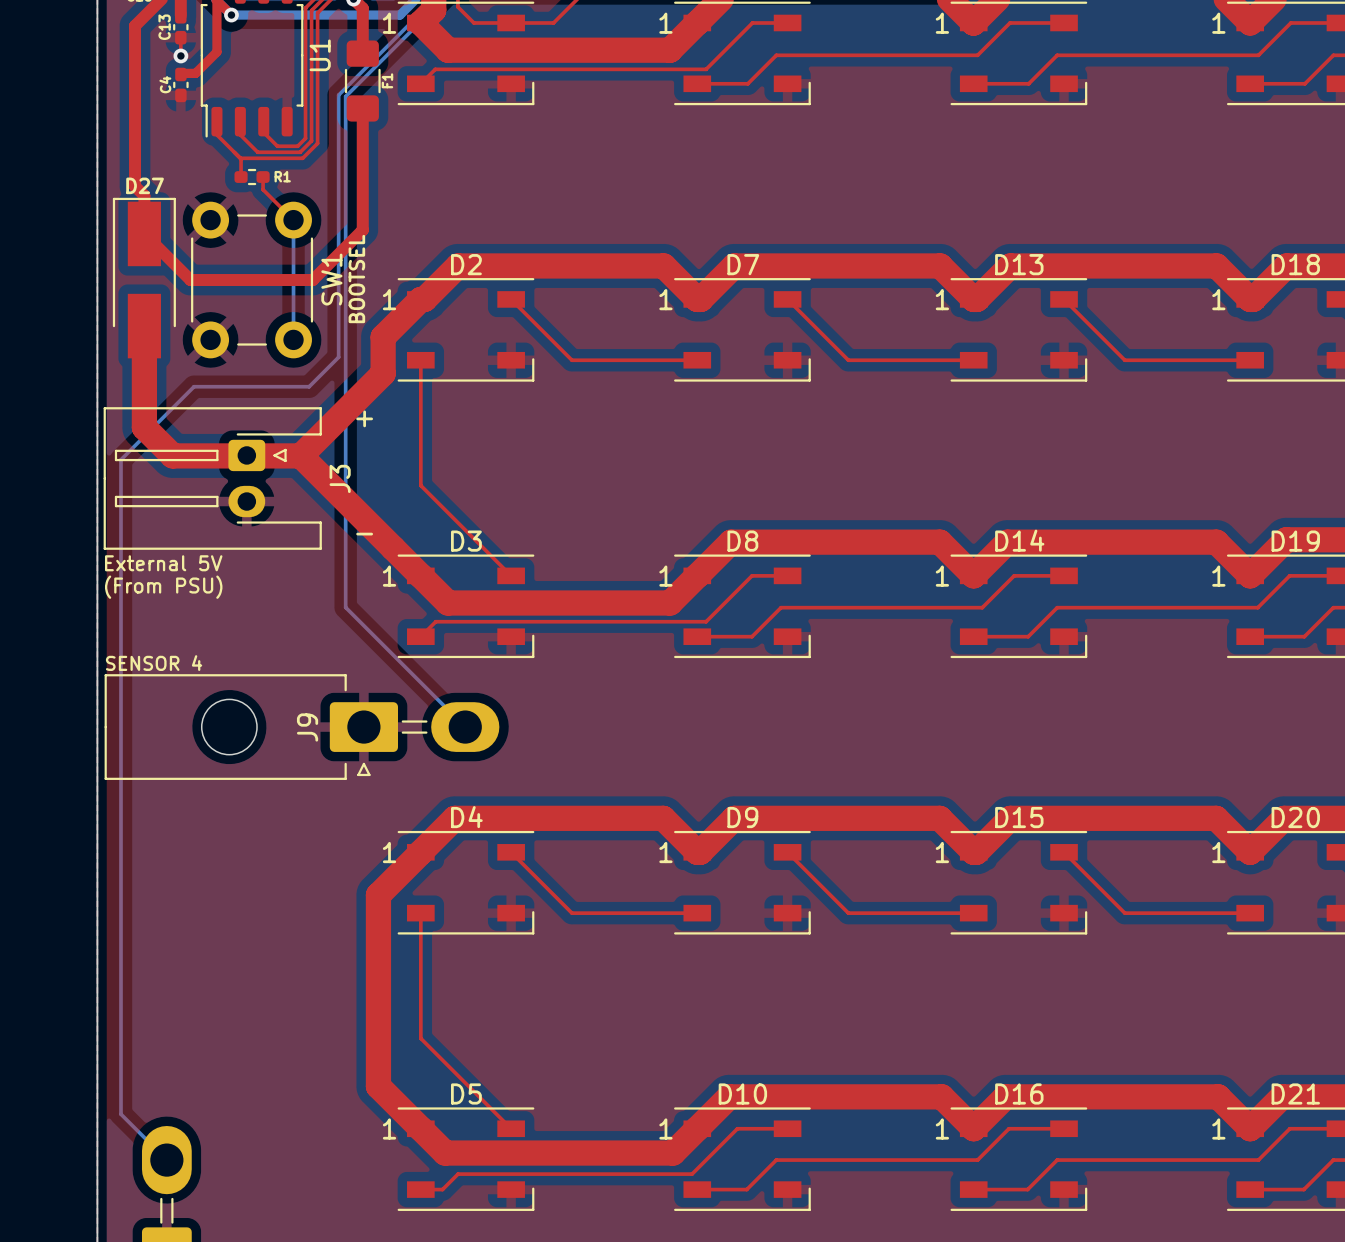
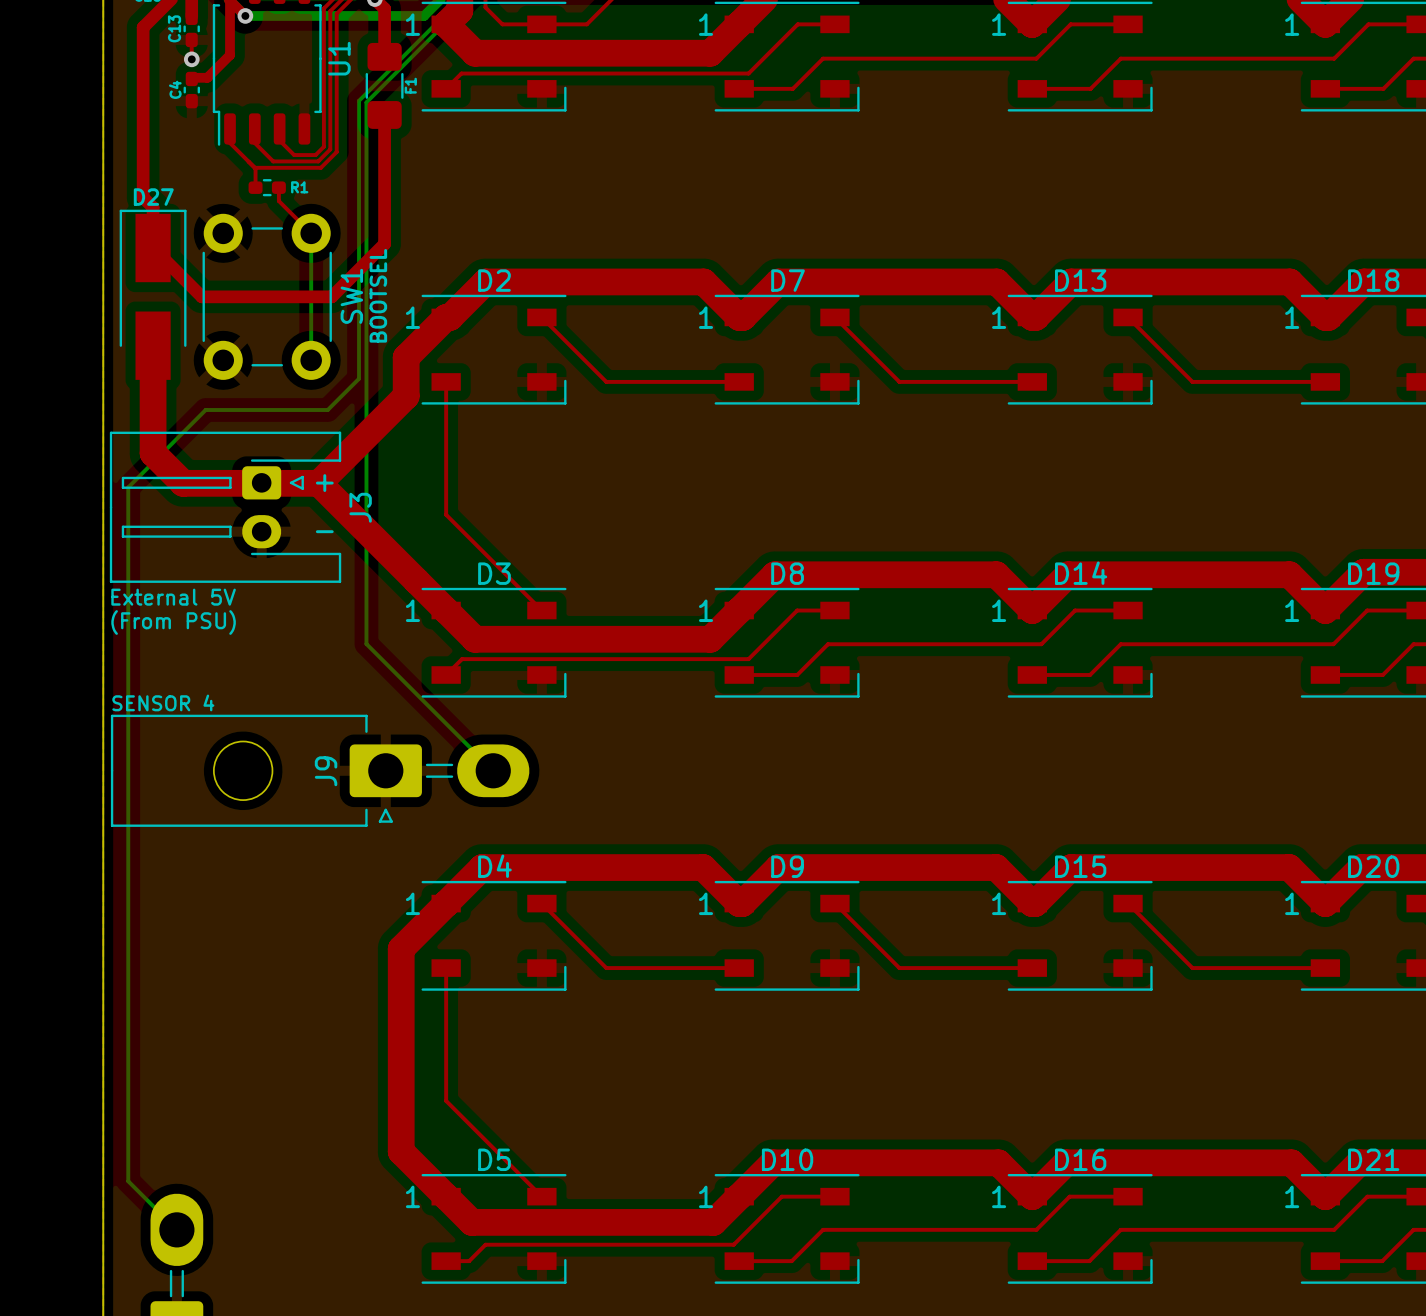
text position: + (364, 418) -> + (324, 483)
text position: - (364, 534) -> - (324, 531)

